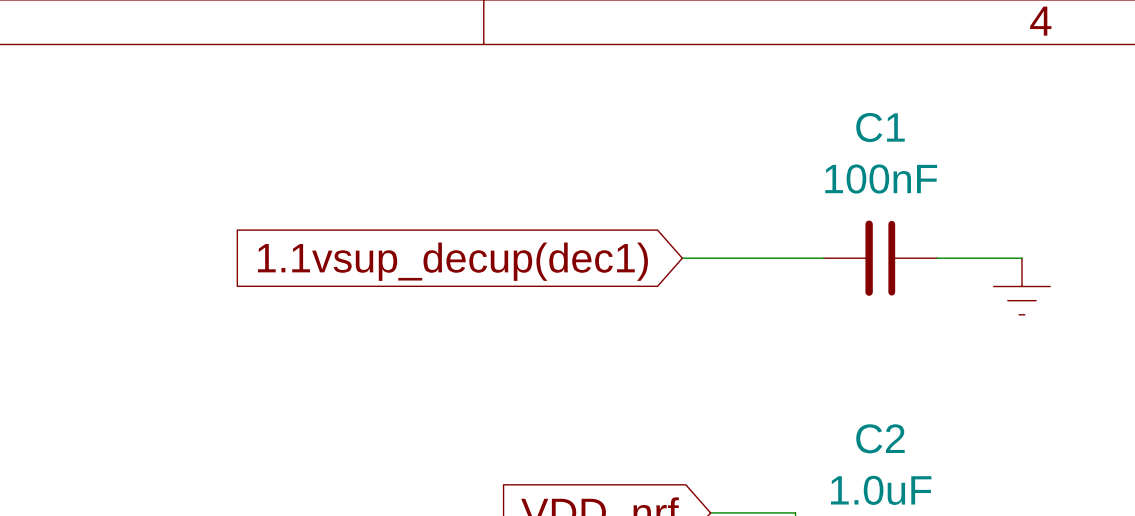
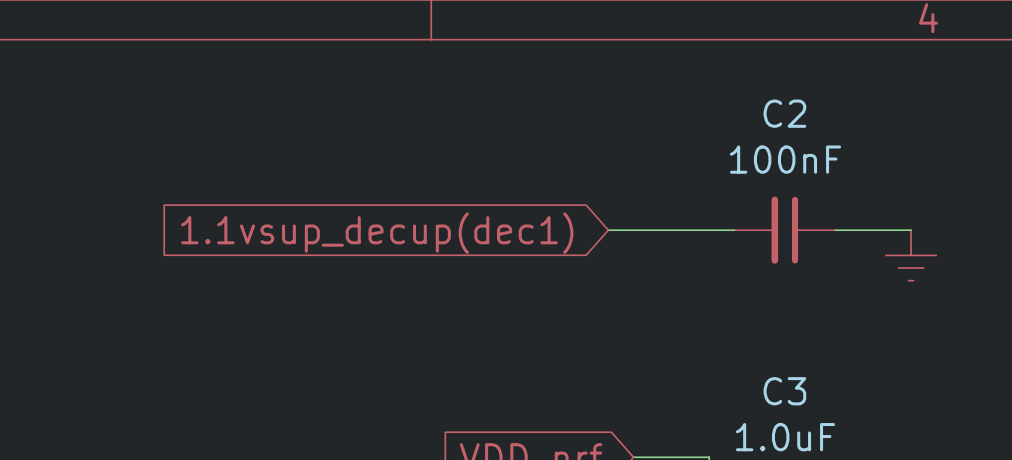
C1 name: C1 (880, 127) -> C2 (784, 113)
C2 name: C2 (880, 438) -> C3 (784, 391)

